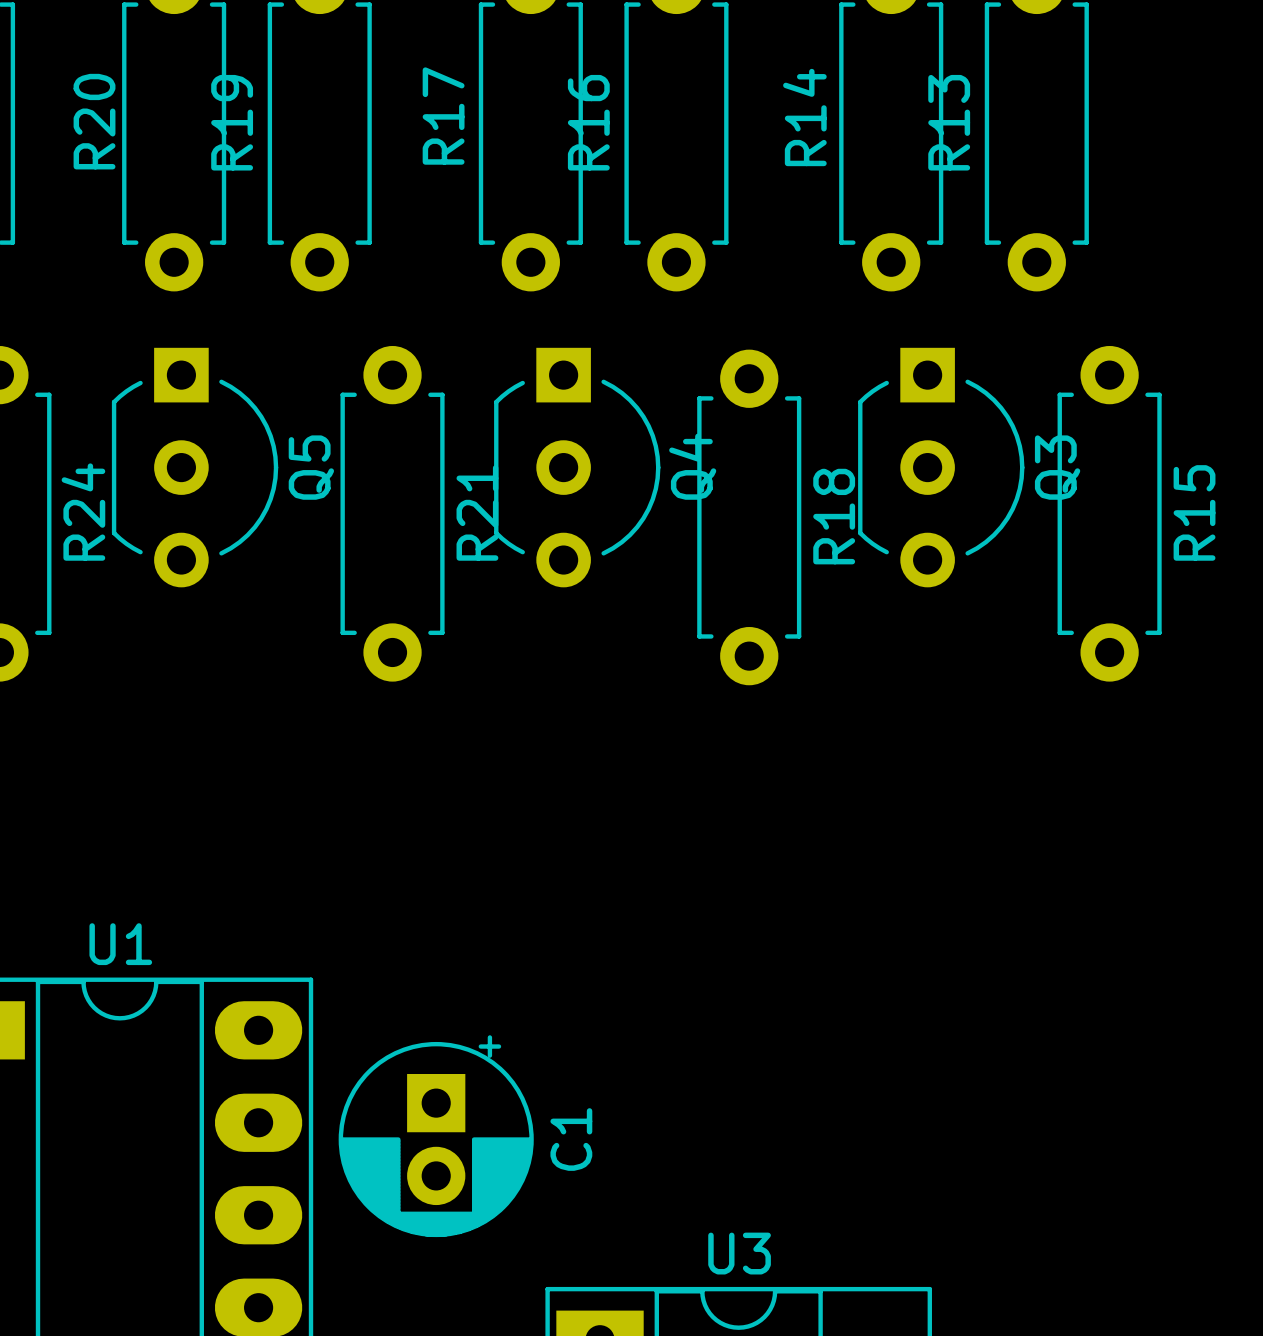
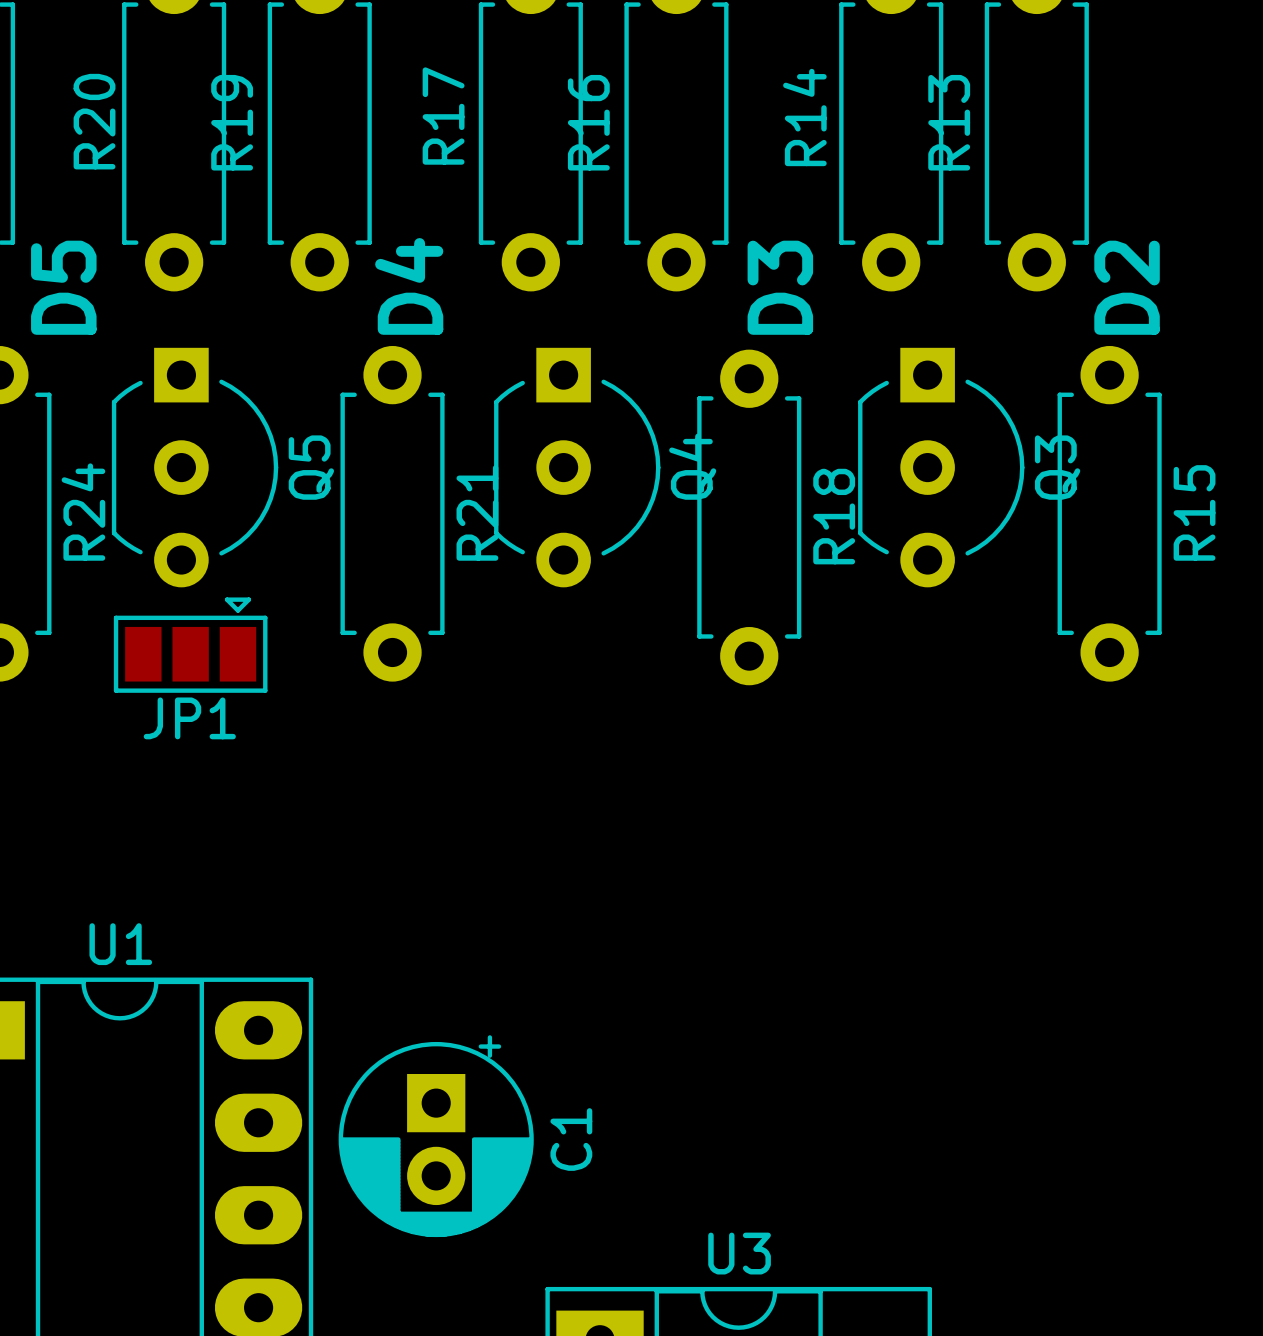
text: none -> D4 (409, 286)
text: none -> D5 (63, 287)
text: none -> D3 (780, 287)
text: none -> D2 (1127, 287)
JP1: none -> (190, 645)

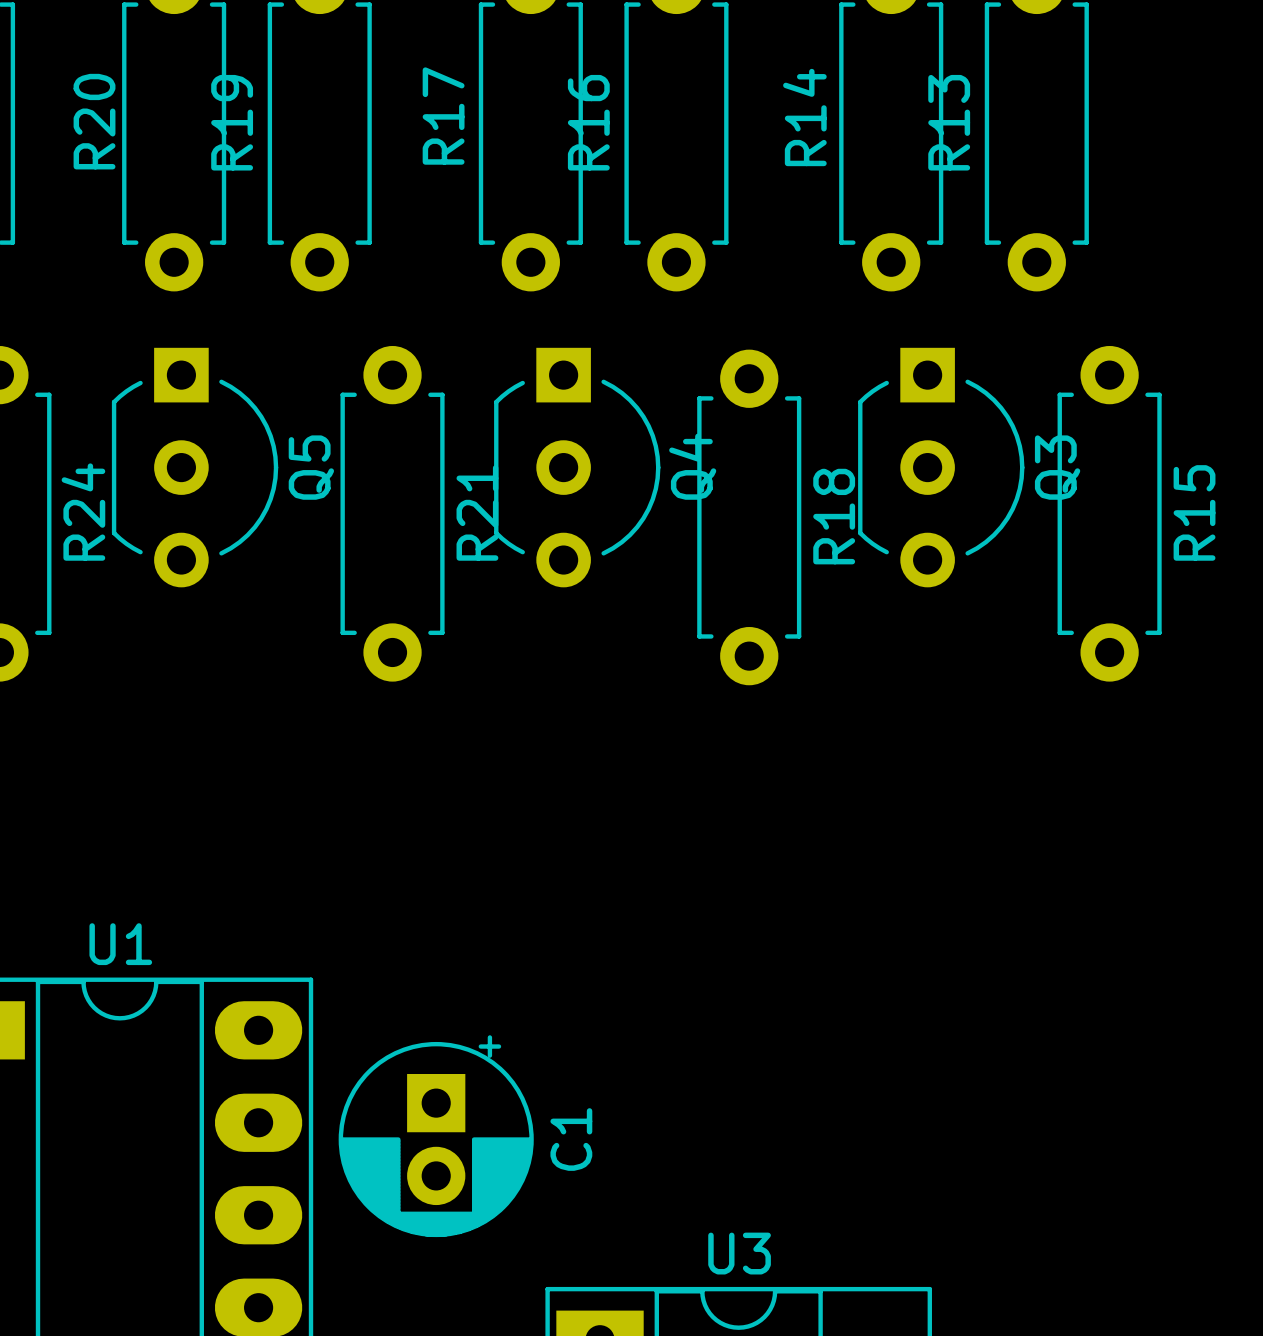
text: D4 (409, 286) -> none
text: D5 (63, 287) -> none
text: D3 (780, 287) -> none
text: D2 (1127, 287) -> none
JP1: (190, 645) -> none

